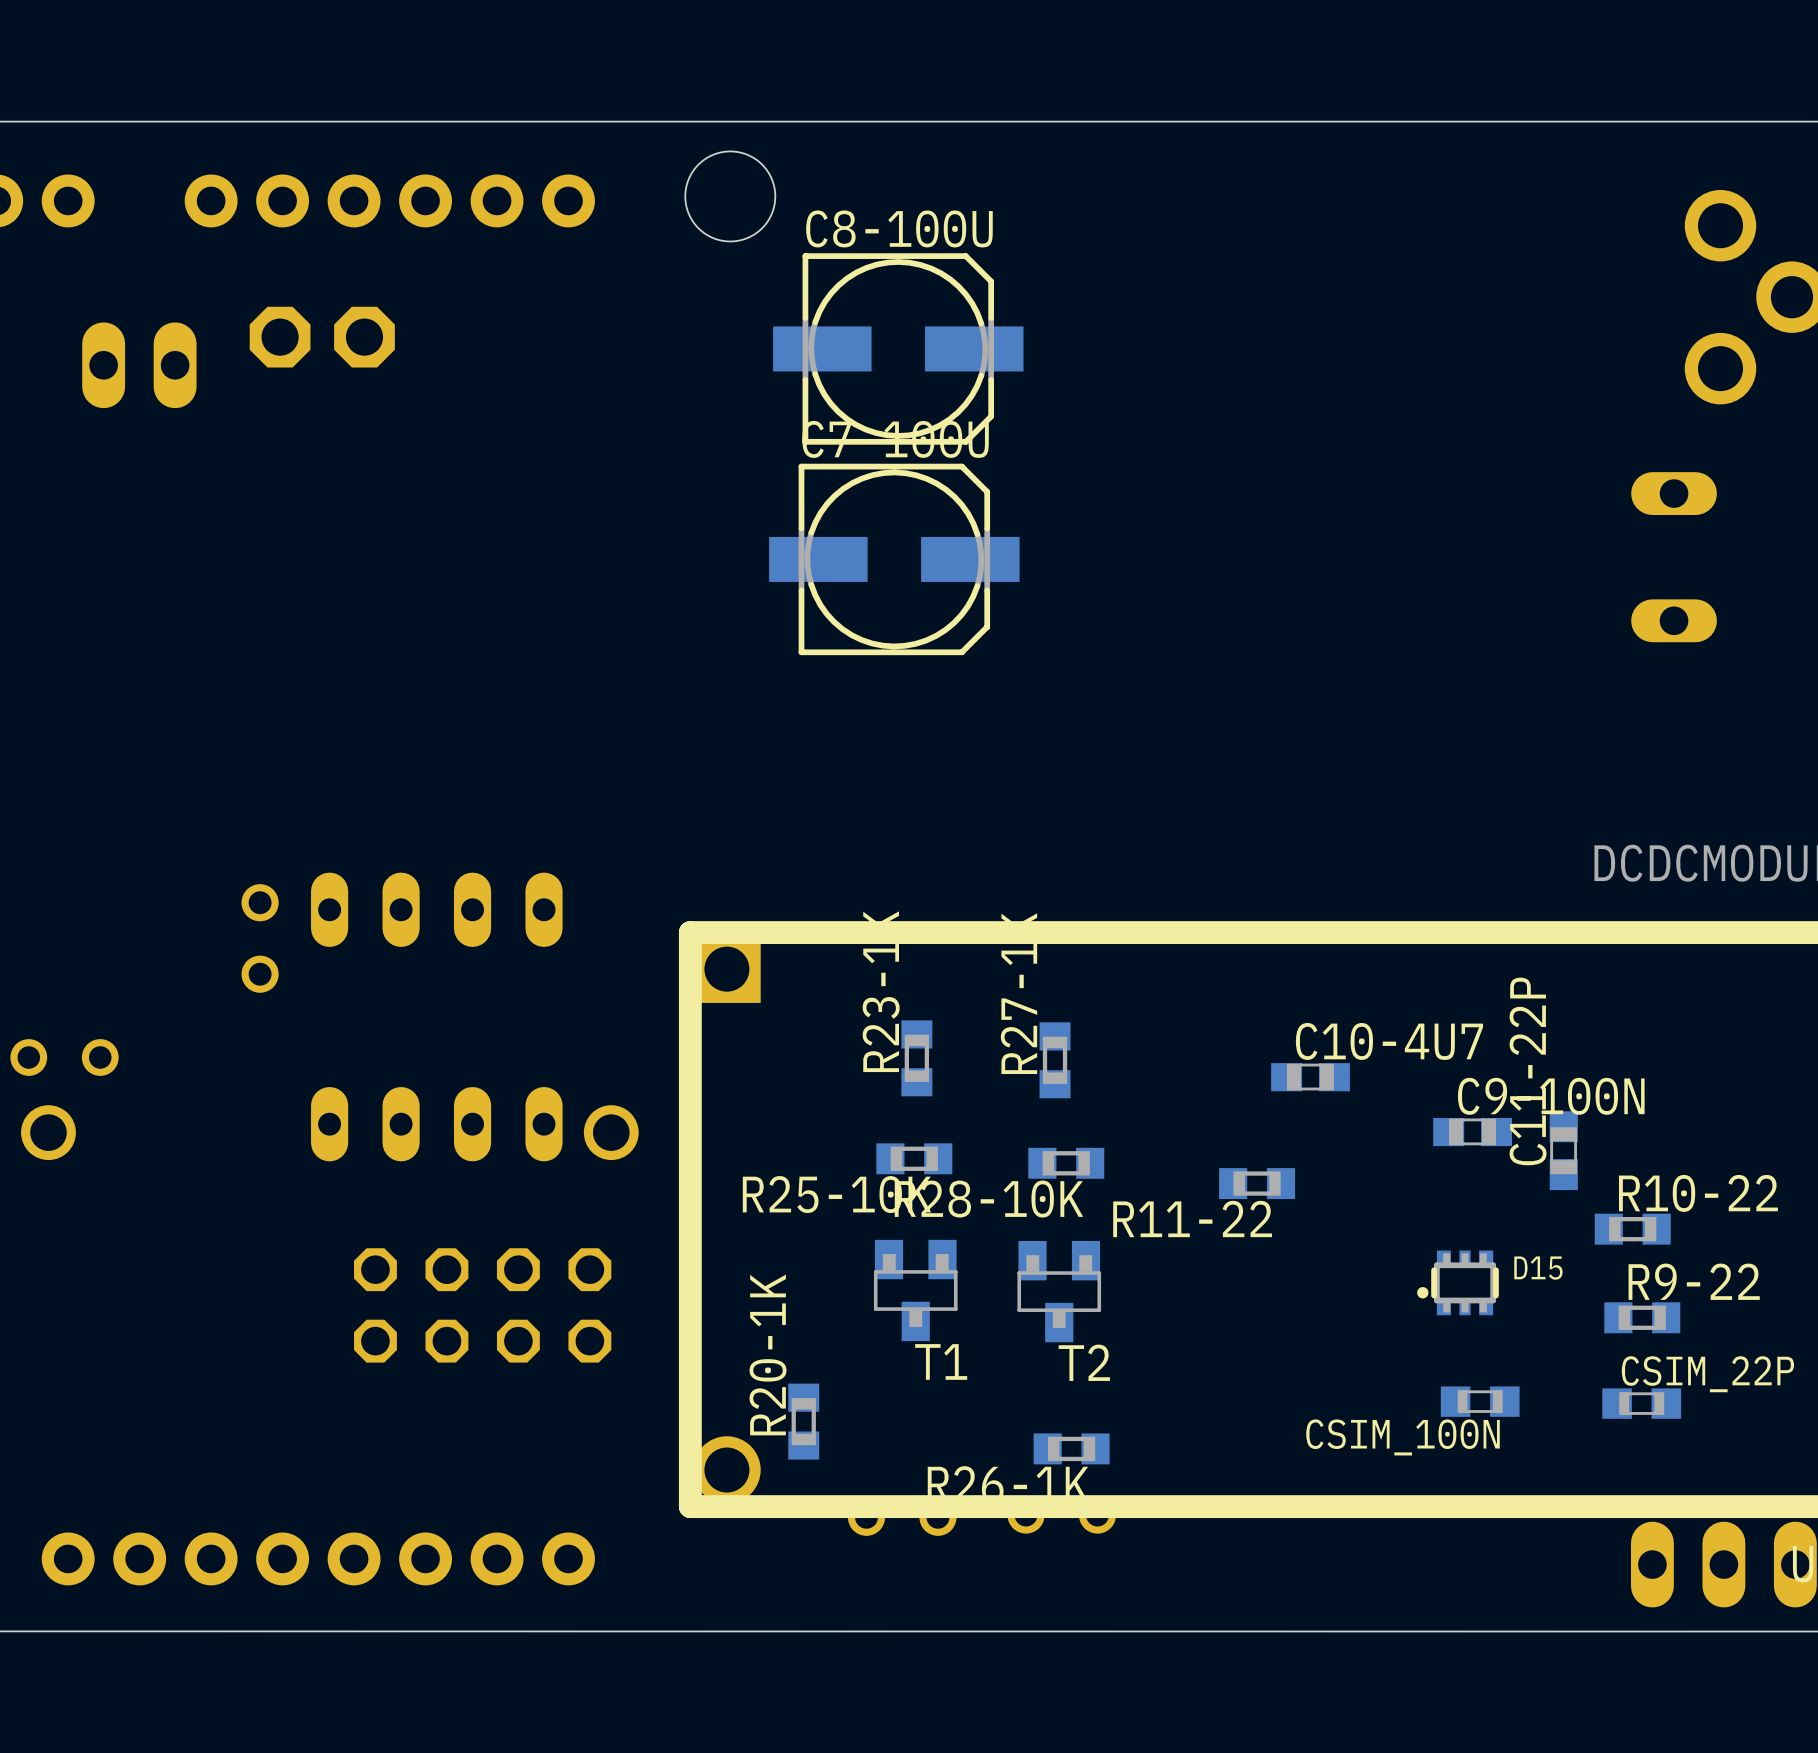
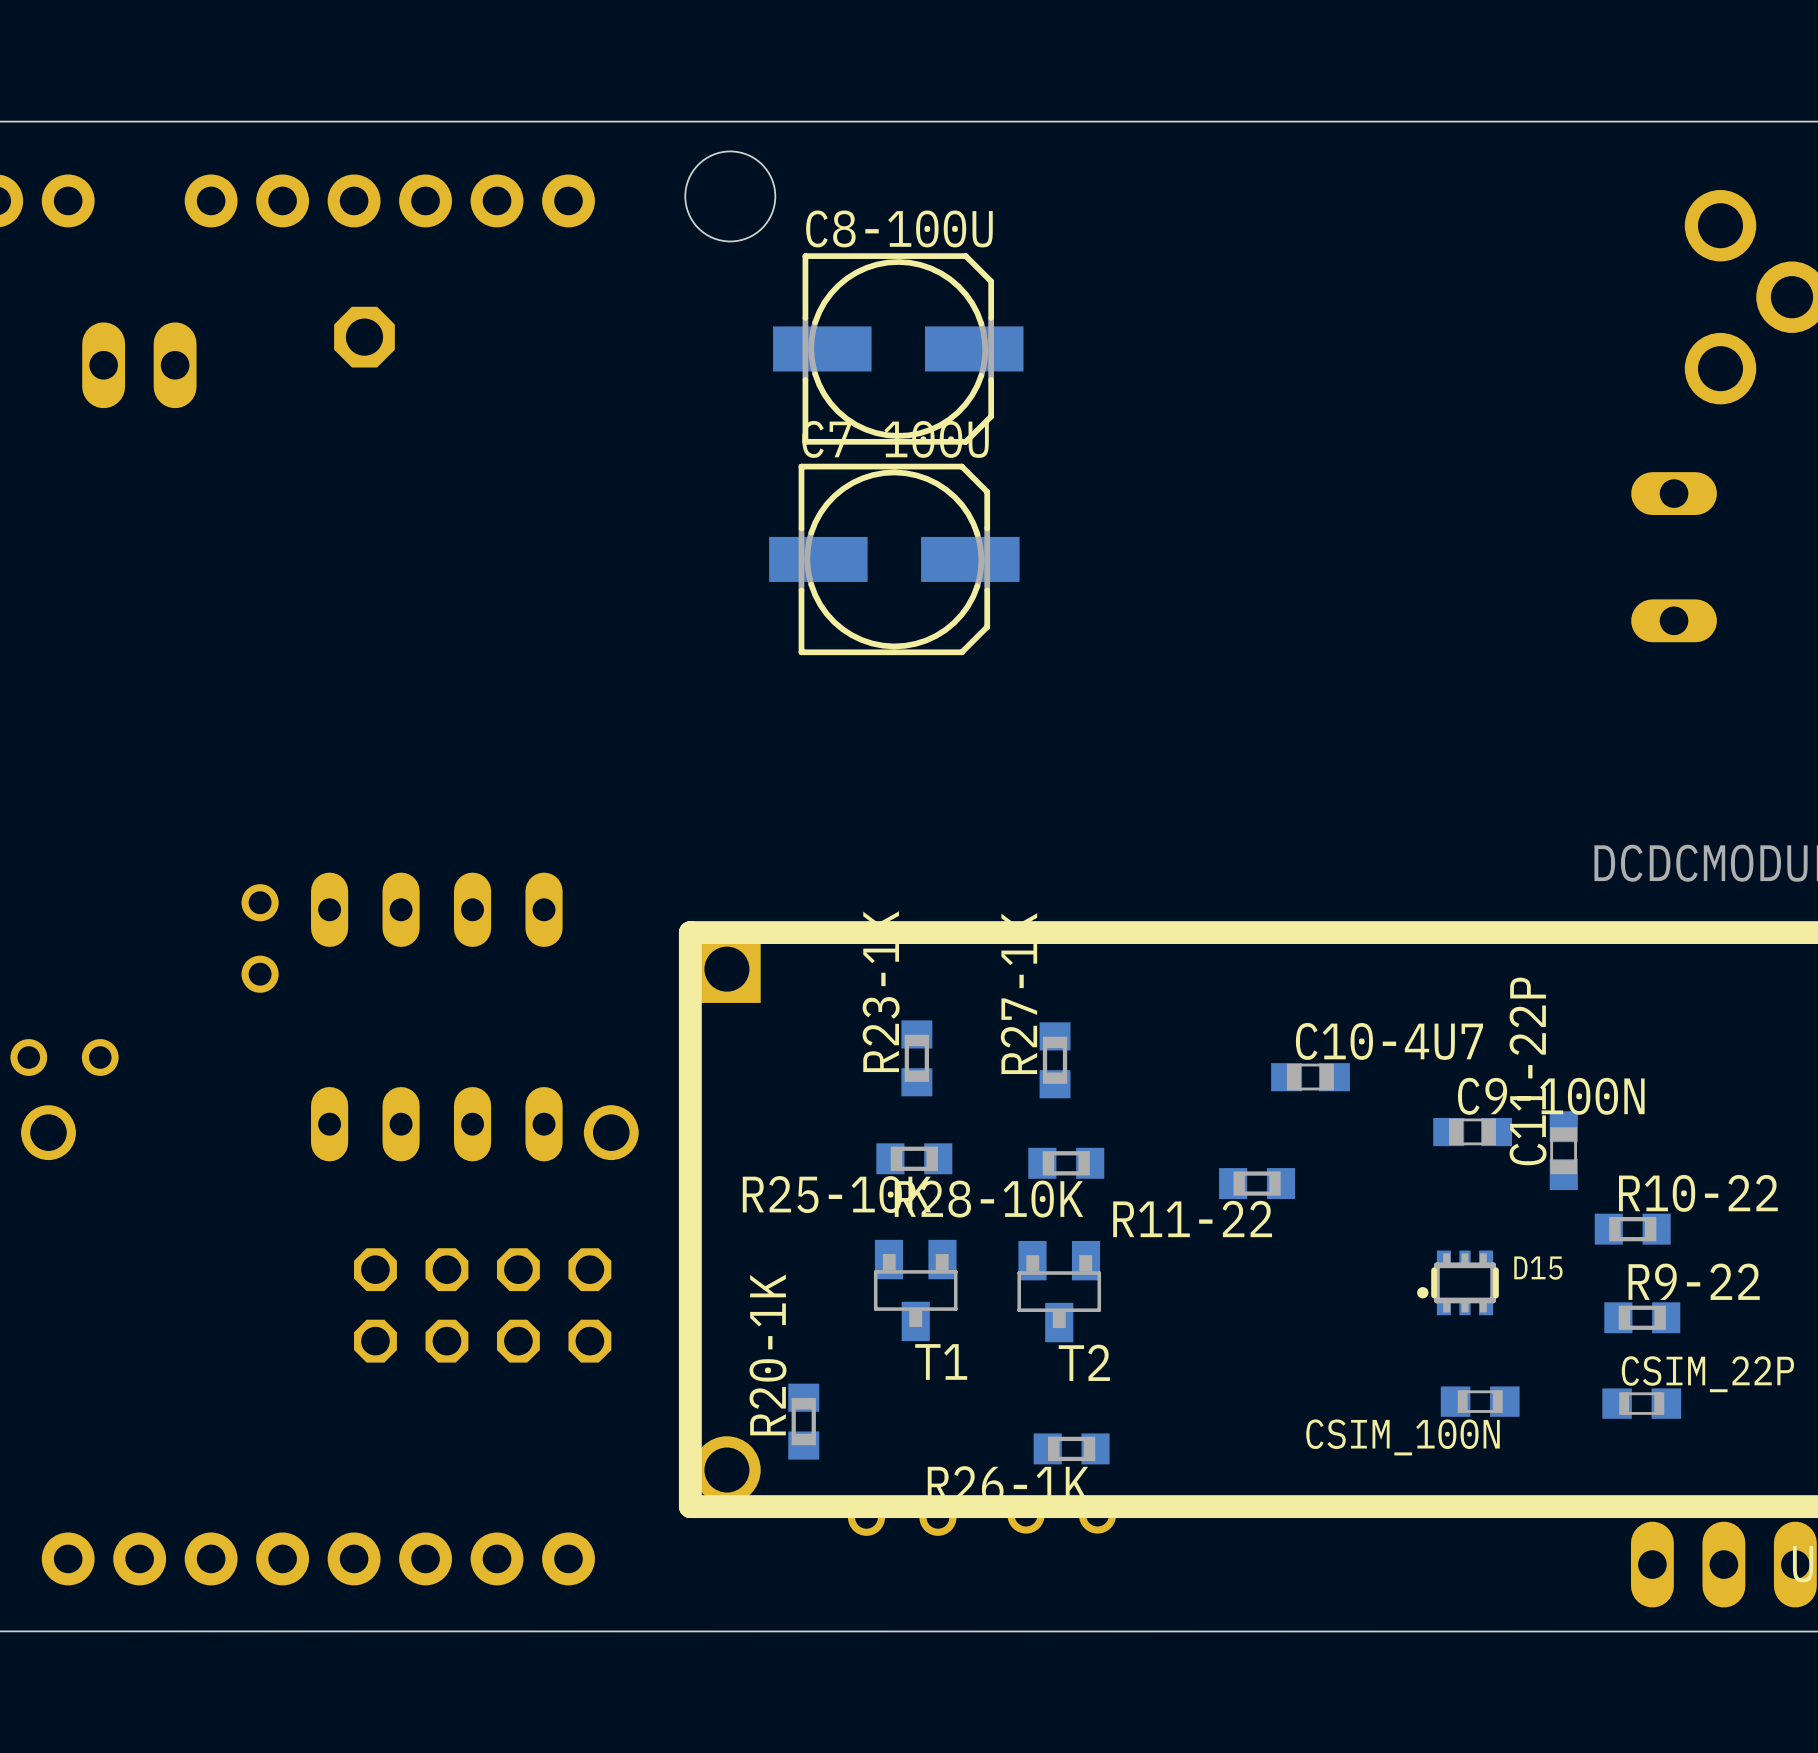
part: (280, 337) -> none

